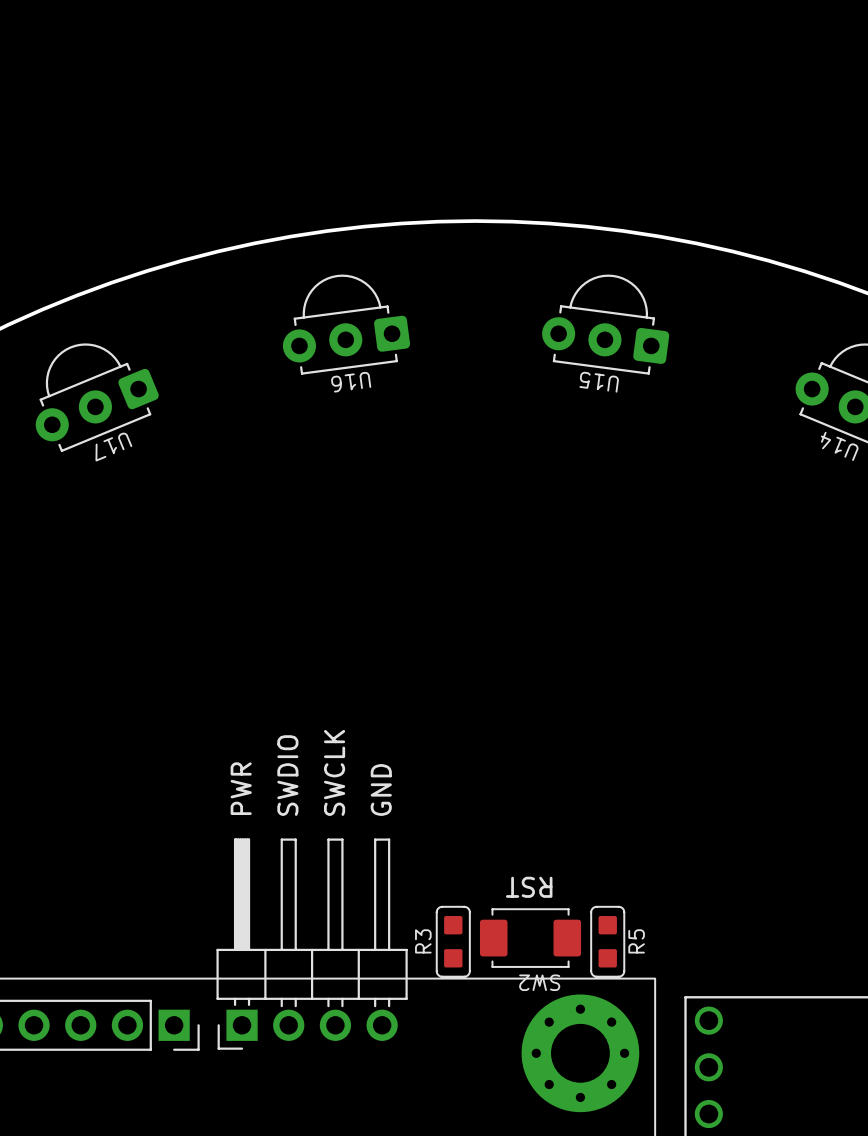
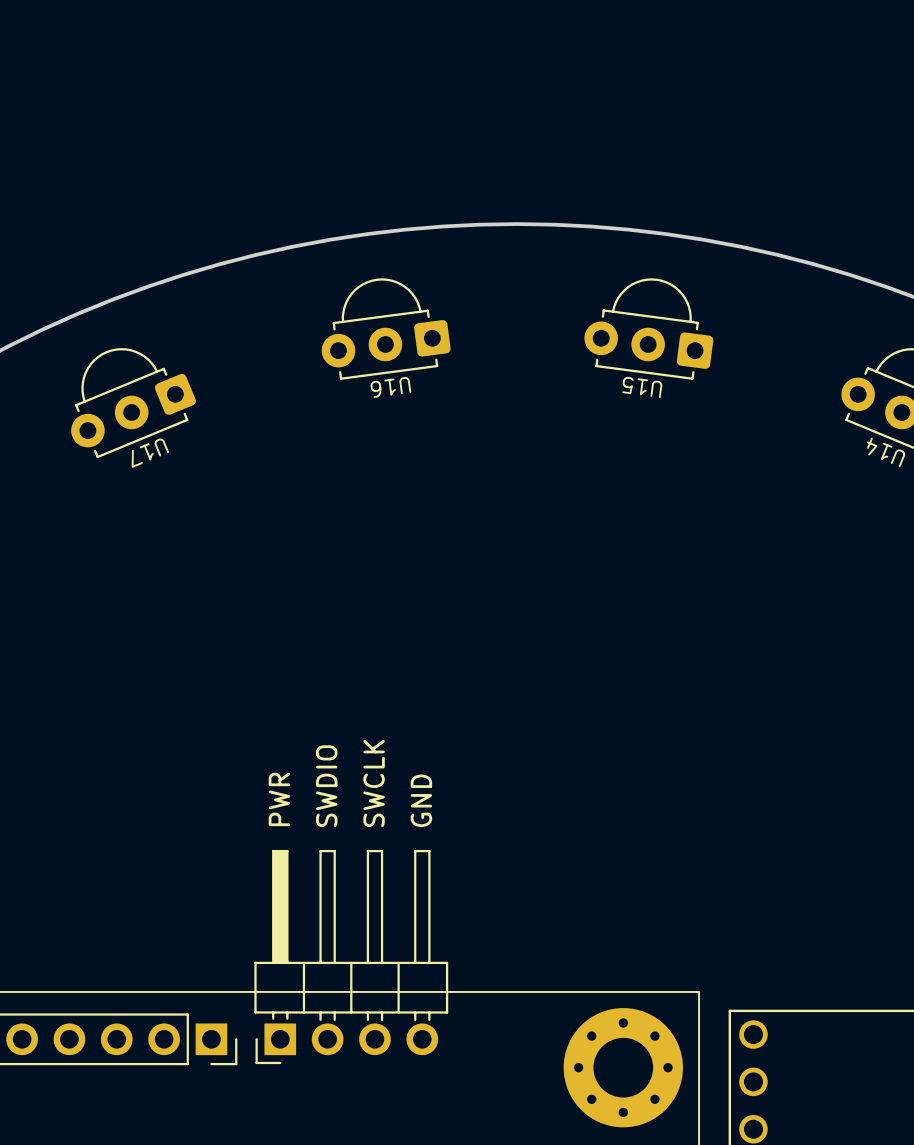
text: RST (529, 887) -> none
SW2: (530, 938) -> none
R3: (453, 941) -> none
R5: (607, 941) -> none

